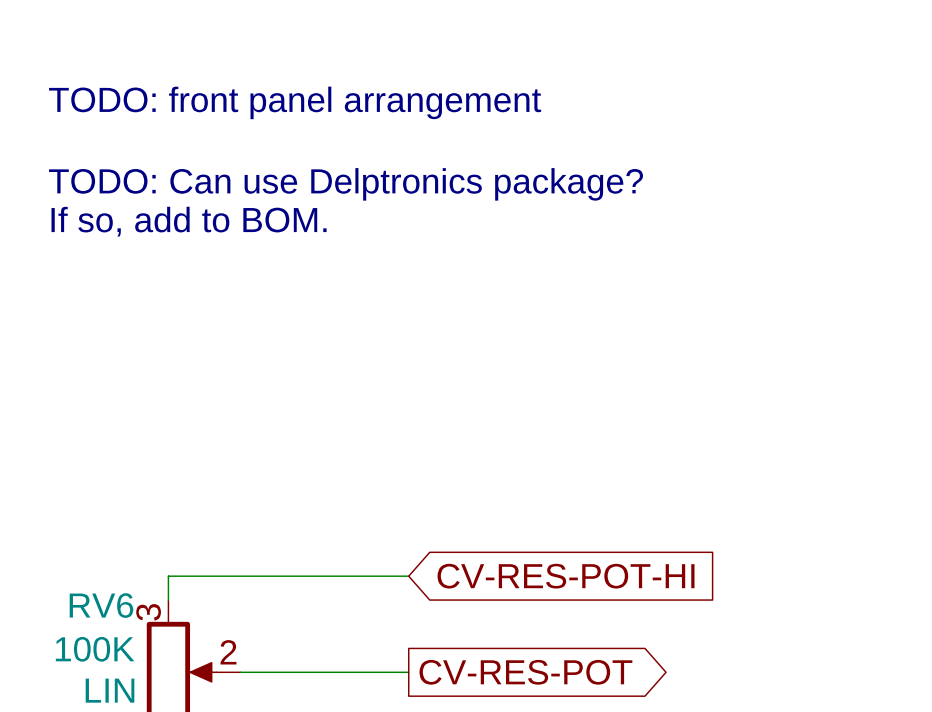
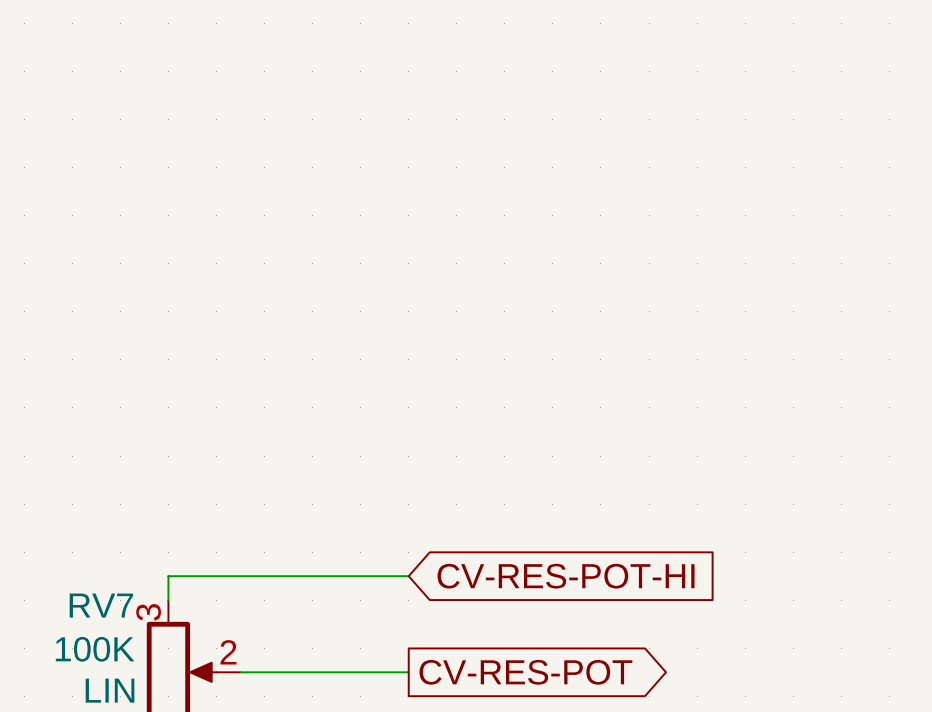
text: TODO: front panel arrangement (295, 102) -> none
text: TODO: Can use Delptronics package? (346, 184) -> none
text: If so, add to BOM. (189, 221) -> none
RV6 name: RV6 (101, 605) -> RV7 (101, 605)

